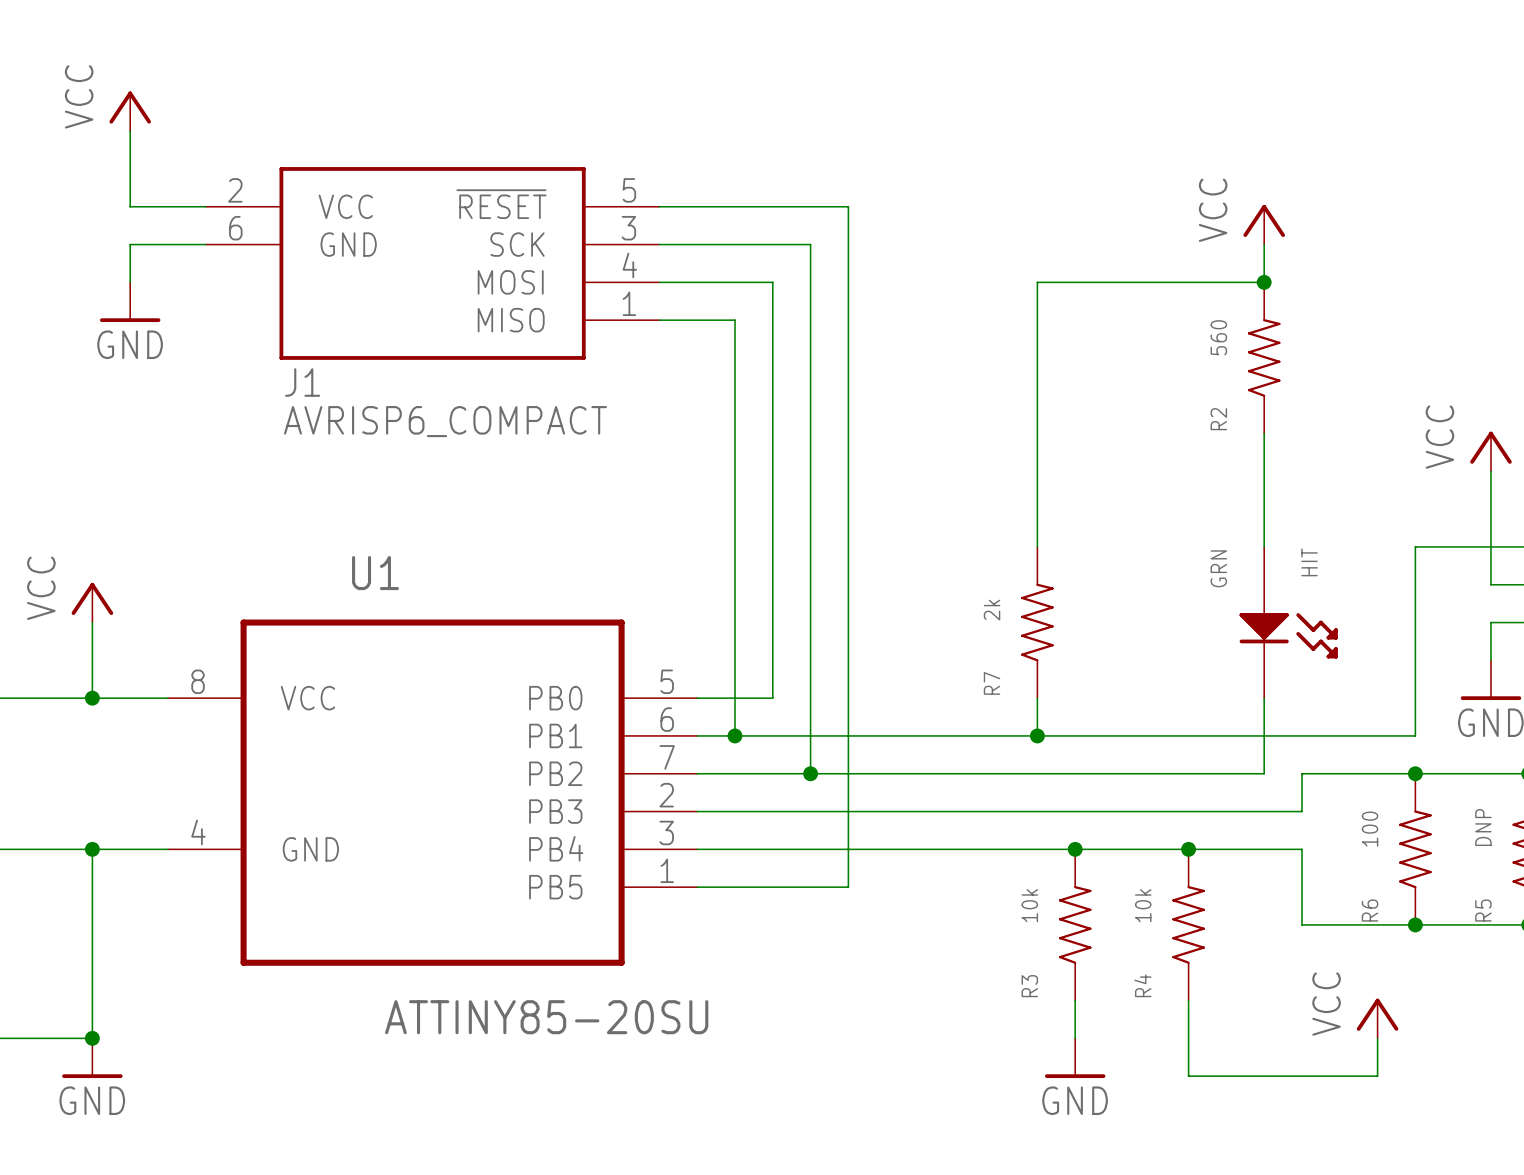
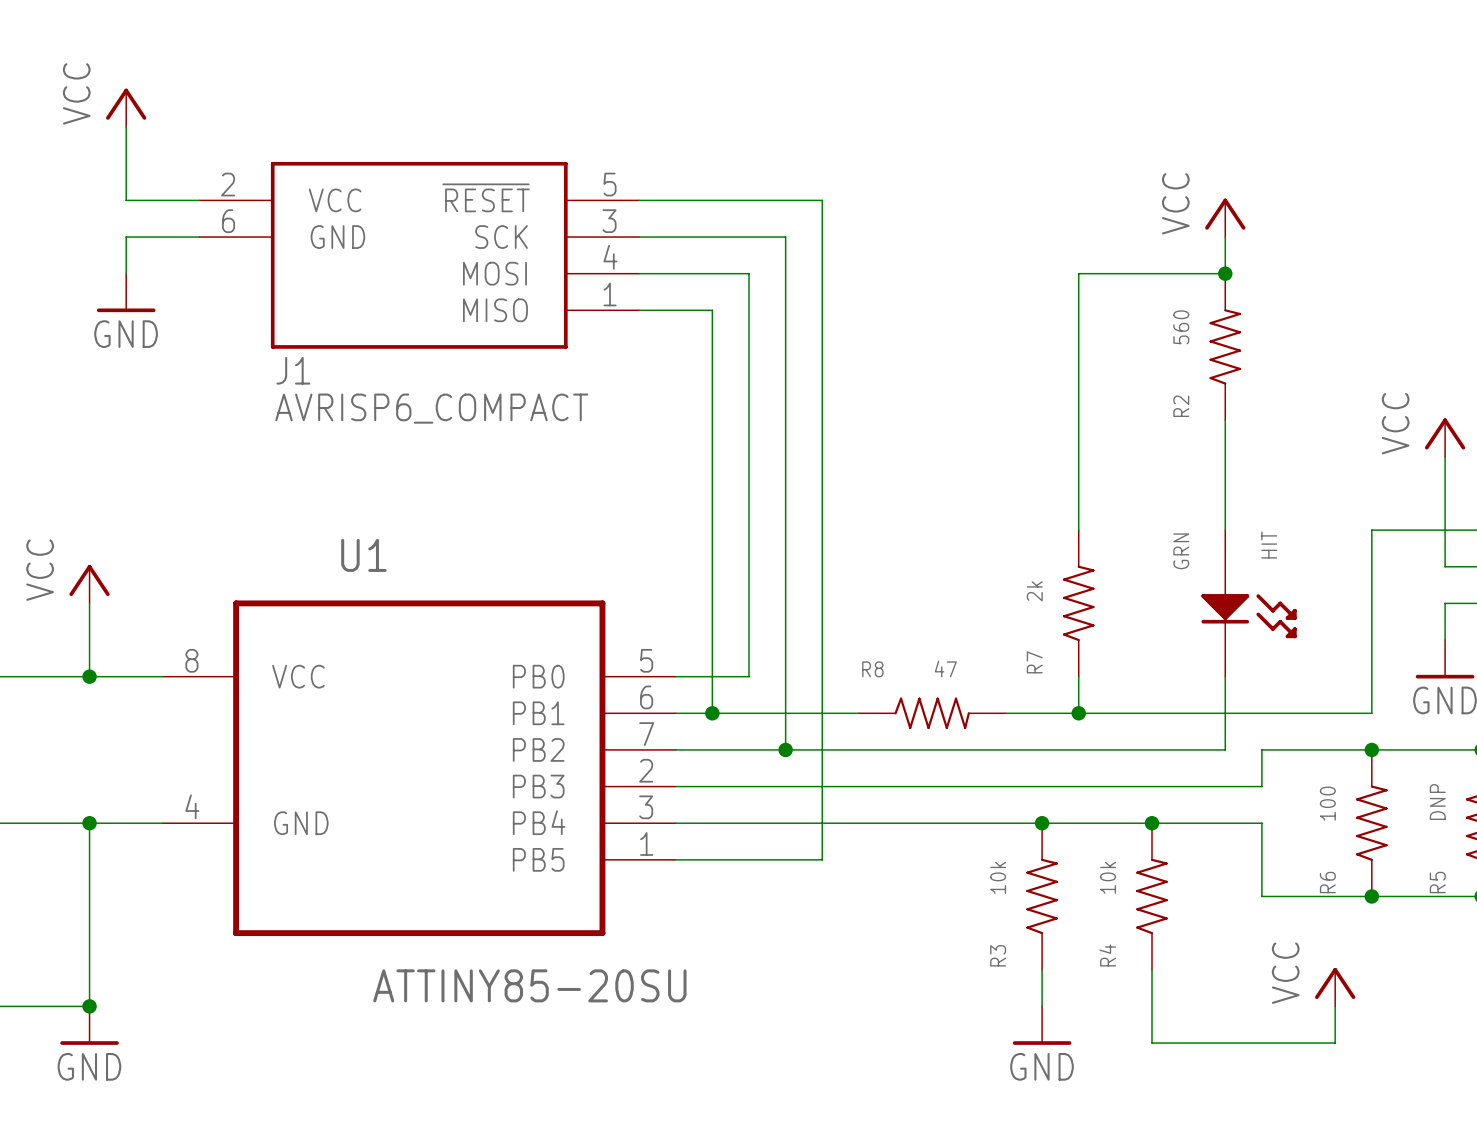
wire: (1112, 282) (1037, 282) (1037, 546) -> (1078, 273) (1078, 530)
R7 position: (1037, 622) -> (1078, 603)
wire: (1037, 698) (1037, 735) (886, 735) -> none
wire: none -> (1078, 676) (1078, 713)
R8: none -> 47 (932, 713)
junction position: (1037, 735) -> (1078, 713)

